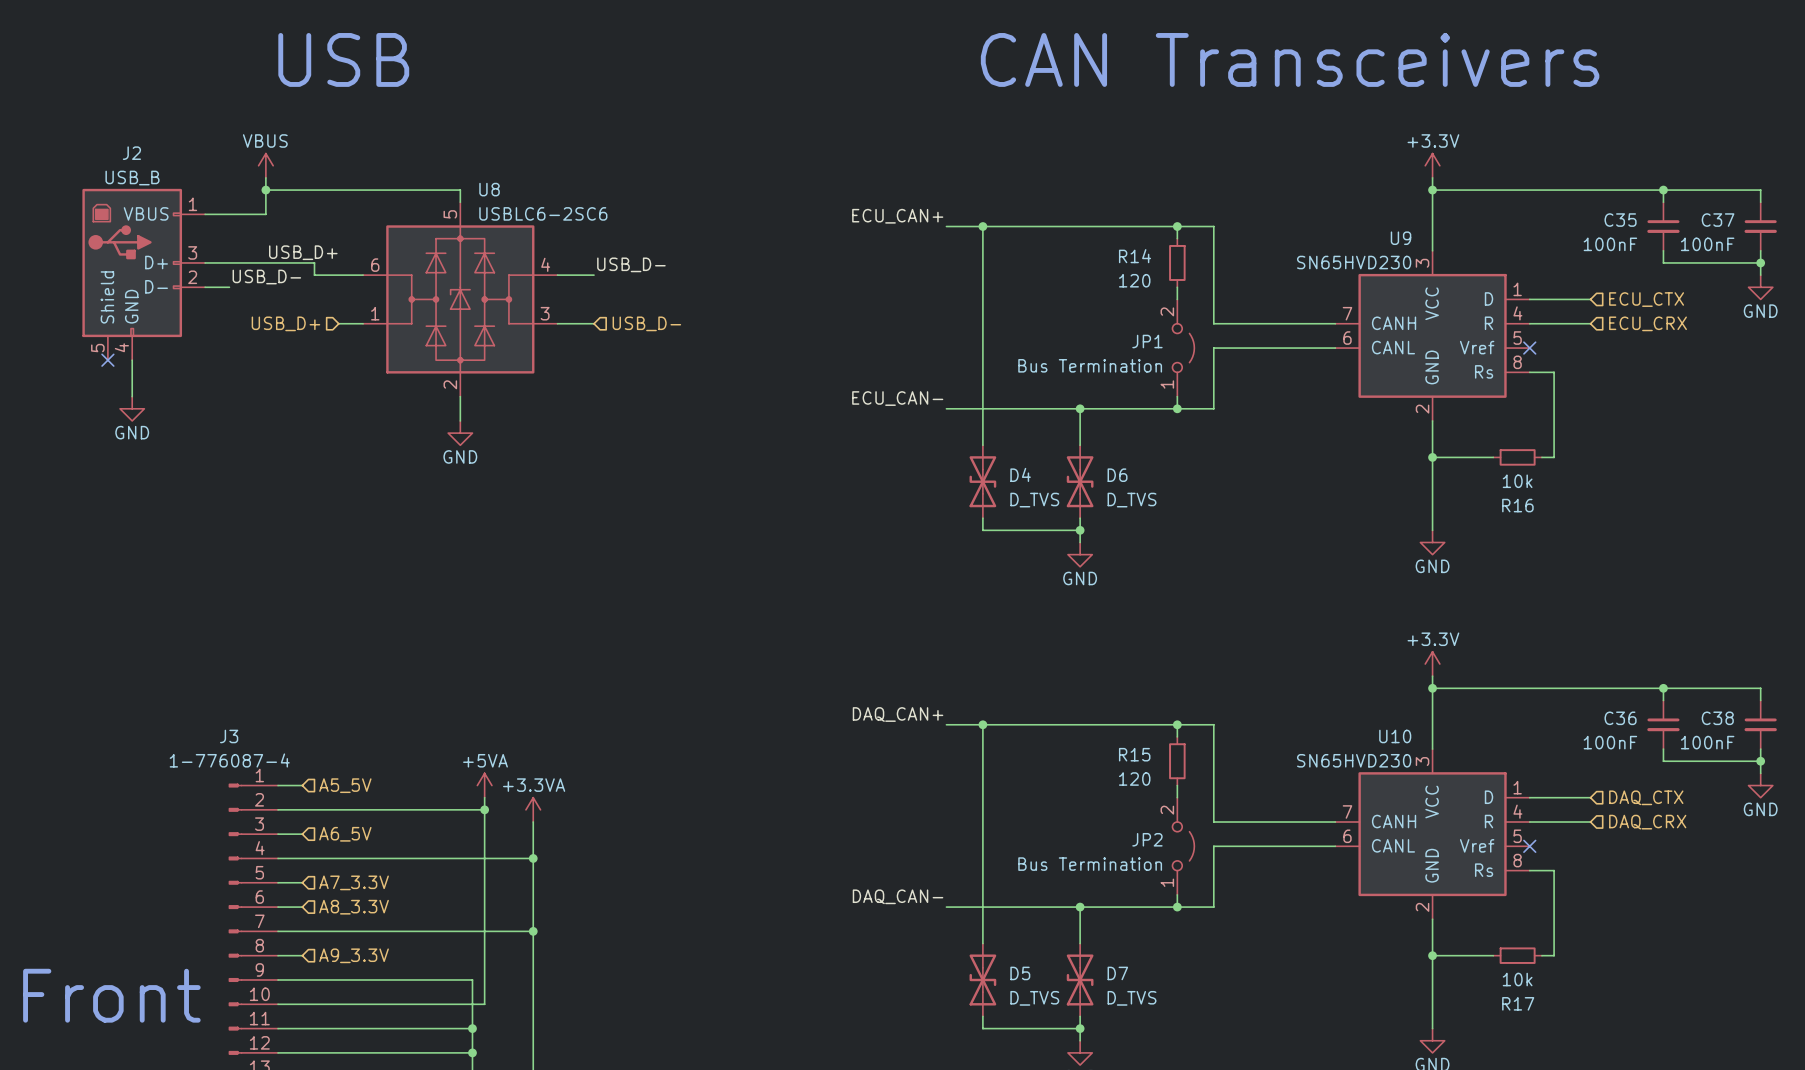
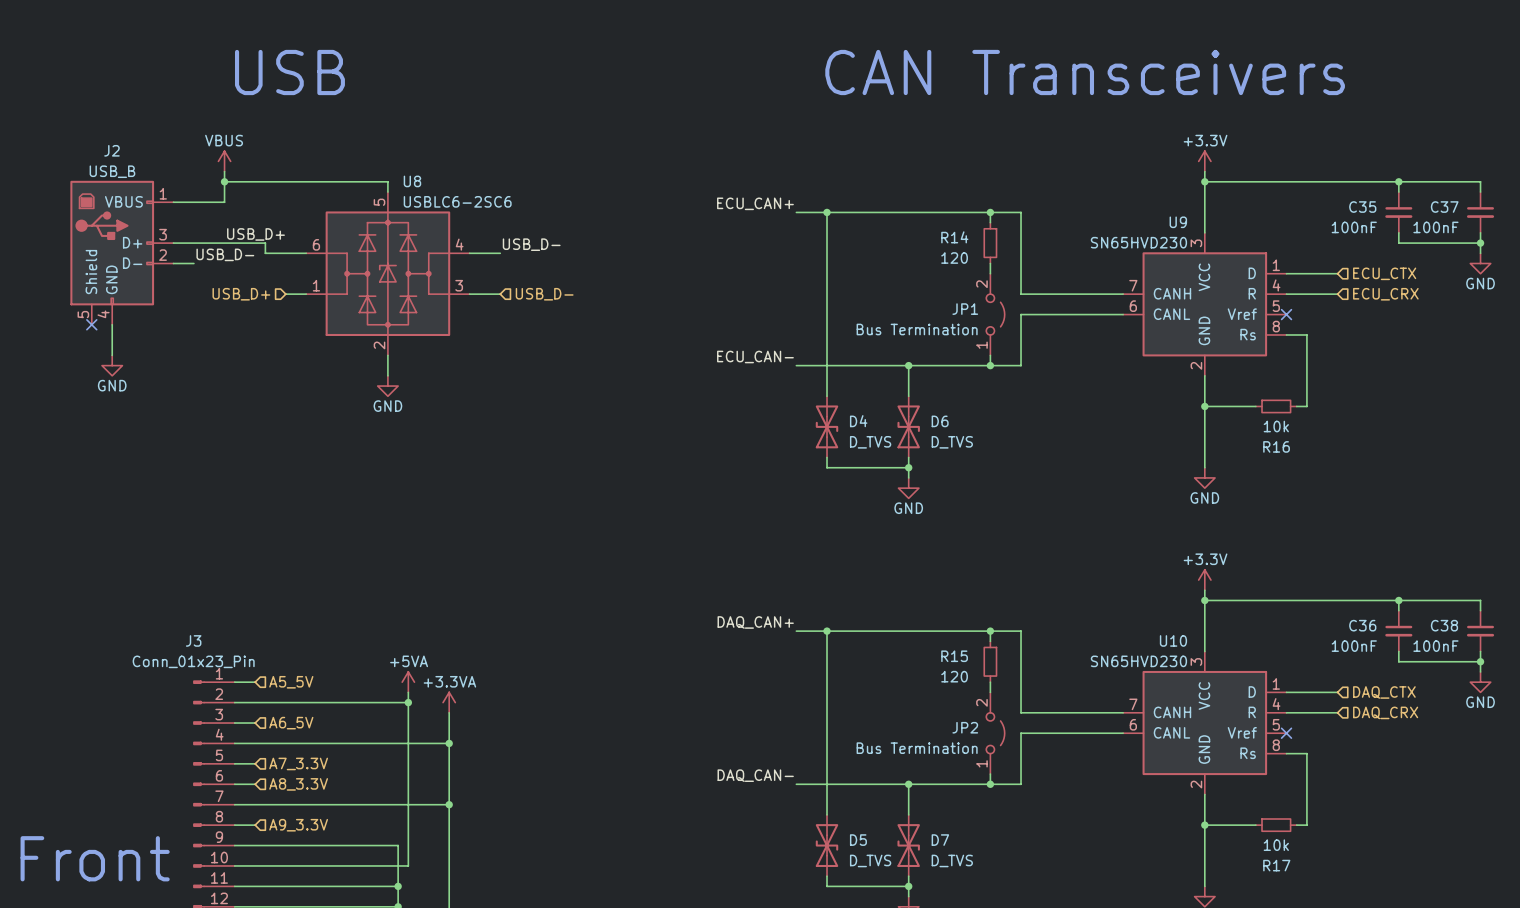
J3 value: 1-776087-4 (229, 760) -> Conn_01x23_Pin (193, 661)

